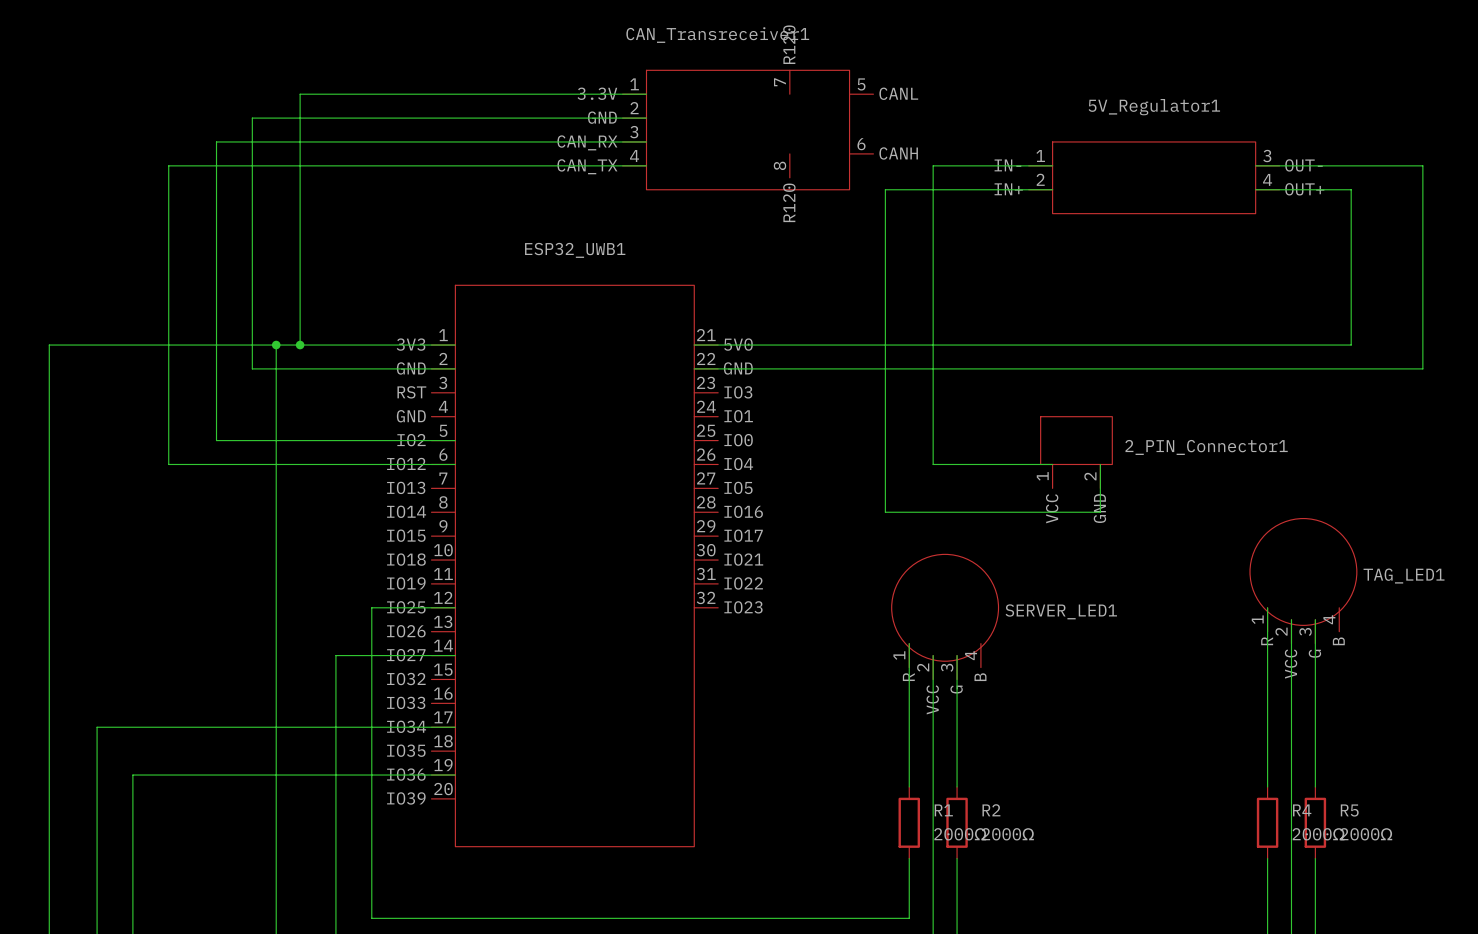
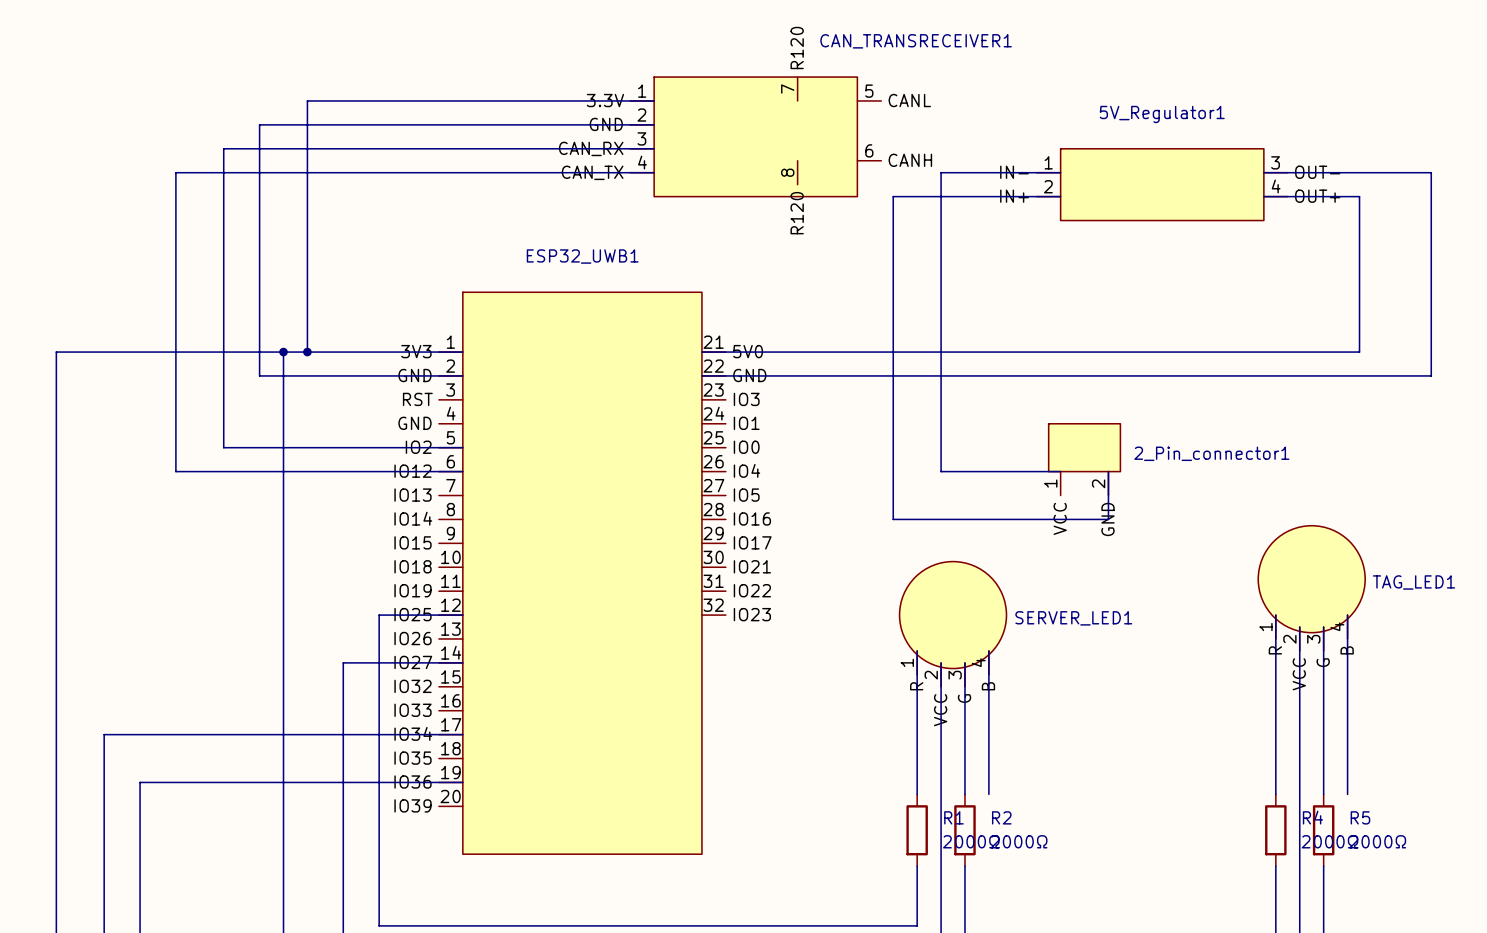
CAN_Transreceiver1 name: CAN_Transreceiver1 (717, 35) -> CAN_TRANSRECEIVER1 (916, 41)
2_PIN_Connector1 name: 2_PIN_Connector1 (1206, 447) -> 2_Pin_connector1 (1211, 453)
wire: none -> (1347, 615) (1347, 794)
wire: none -> (988, 650) (988, 794)

